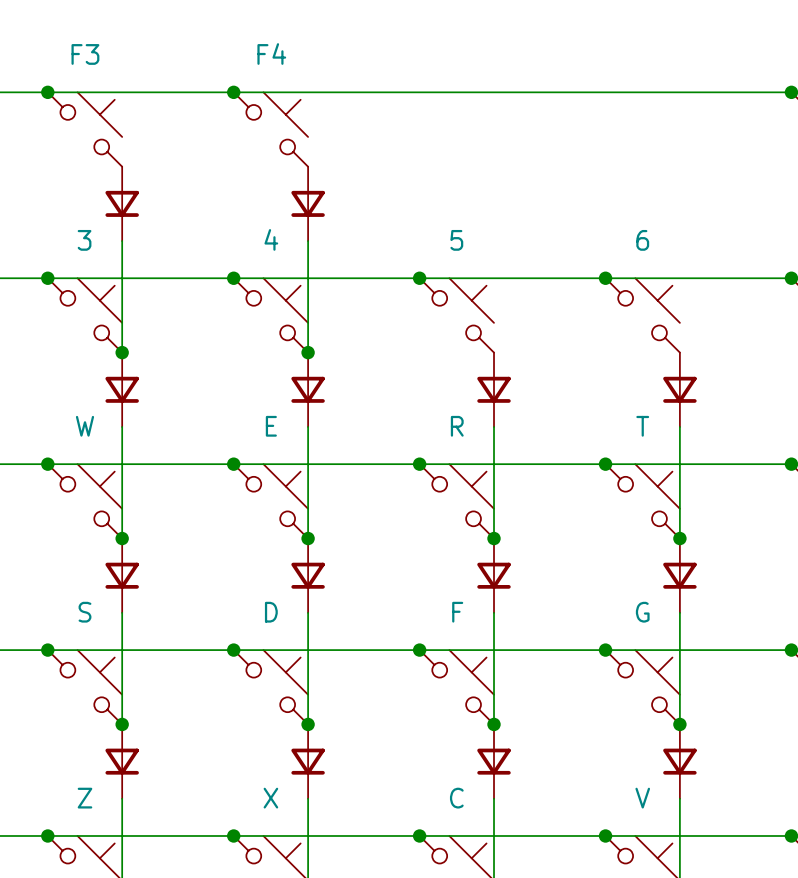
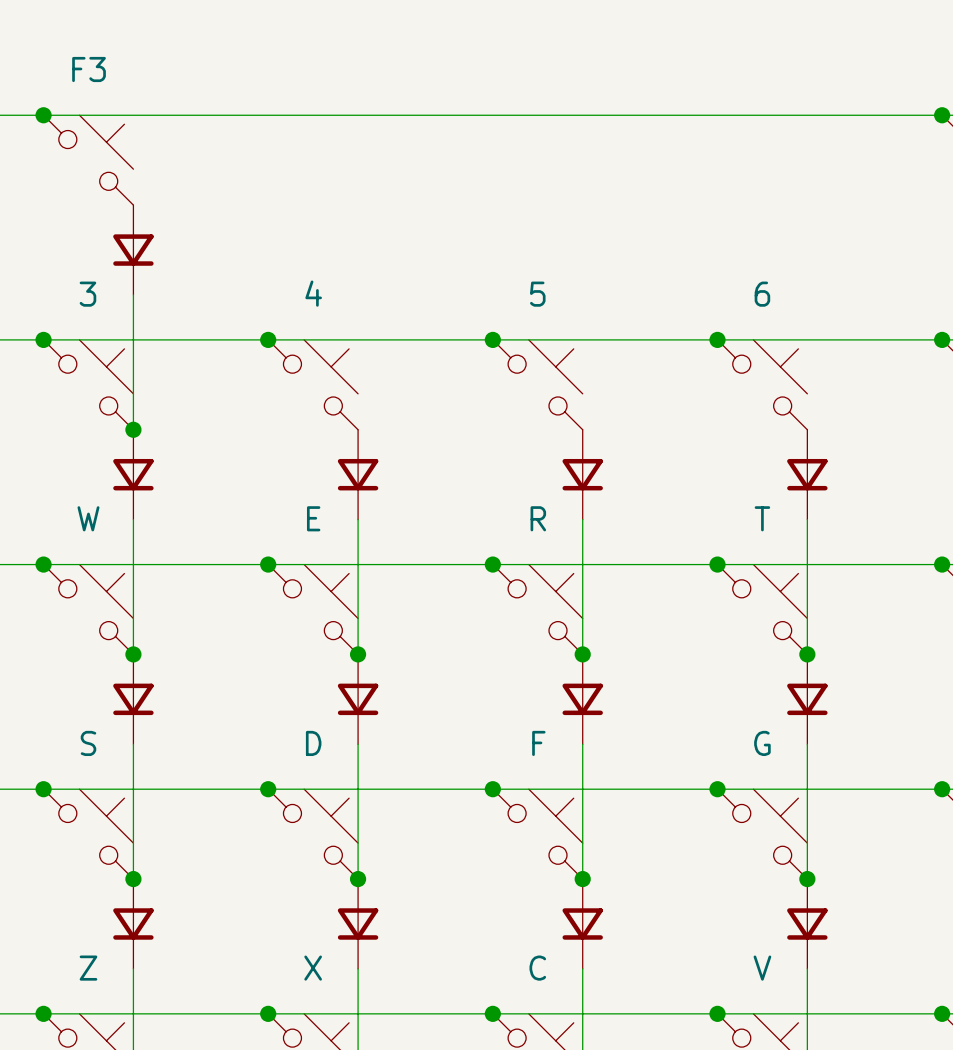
junction: (233, 92) -> none
part: F4 (270, 129) -> none
part: (308, 203) -> none
wire: (308, 241) (308, 352) -> none
junction: (308, 352) -> none

